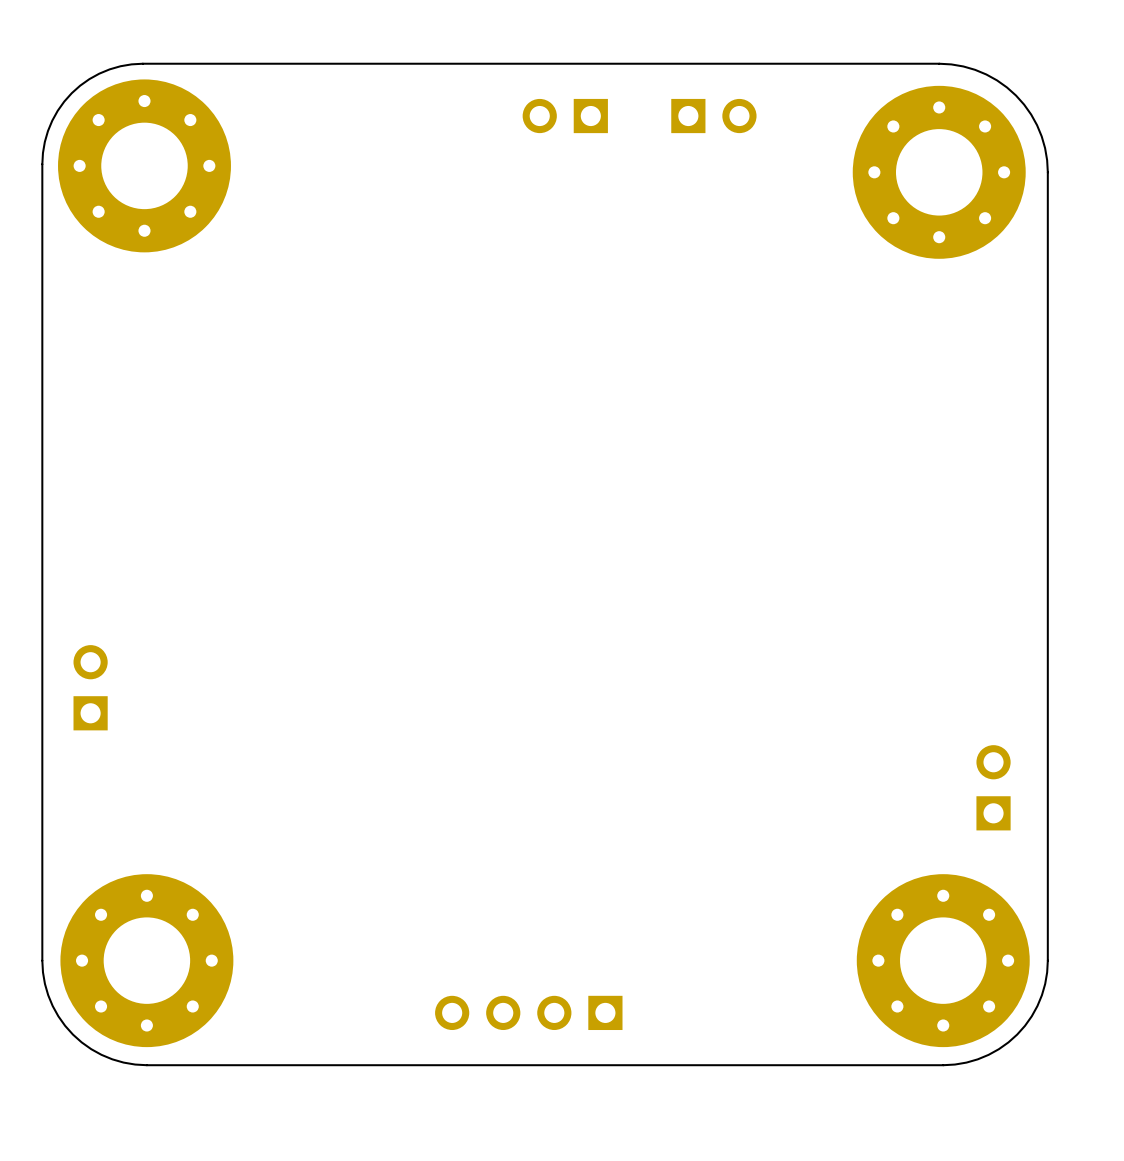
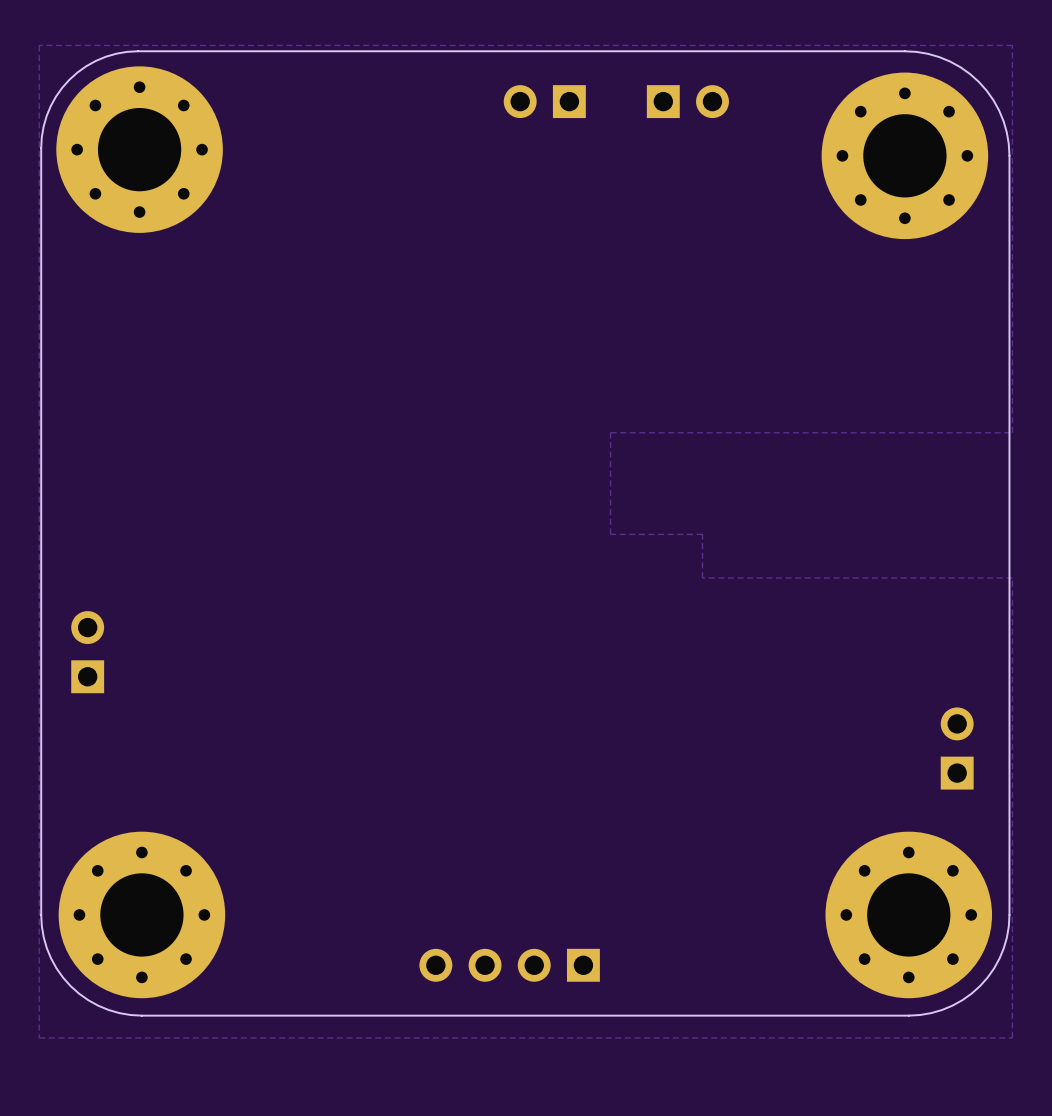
zone outline: none -> (1012, 45) (1012, 432) (610, 432) (610, 534) (702, 534) (702, 577) (1012, 577) (1012, 1037) (39, 1037) (39, 45) (1012, 45)

